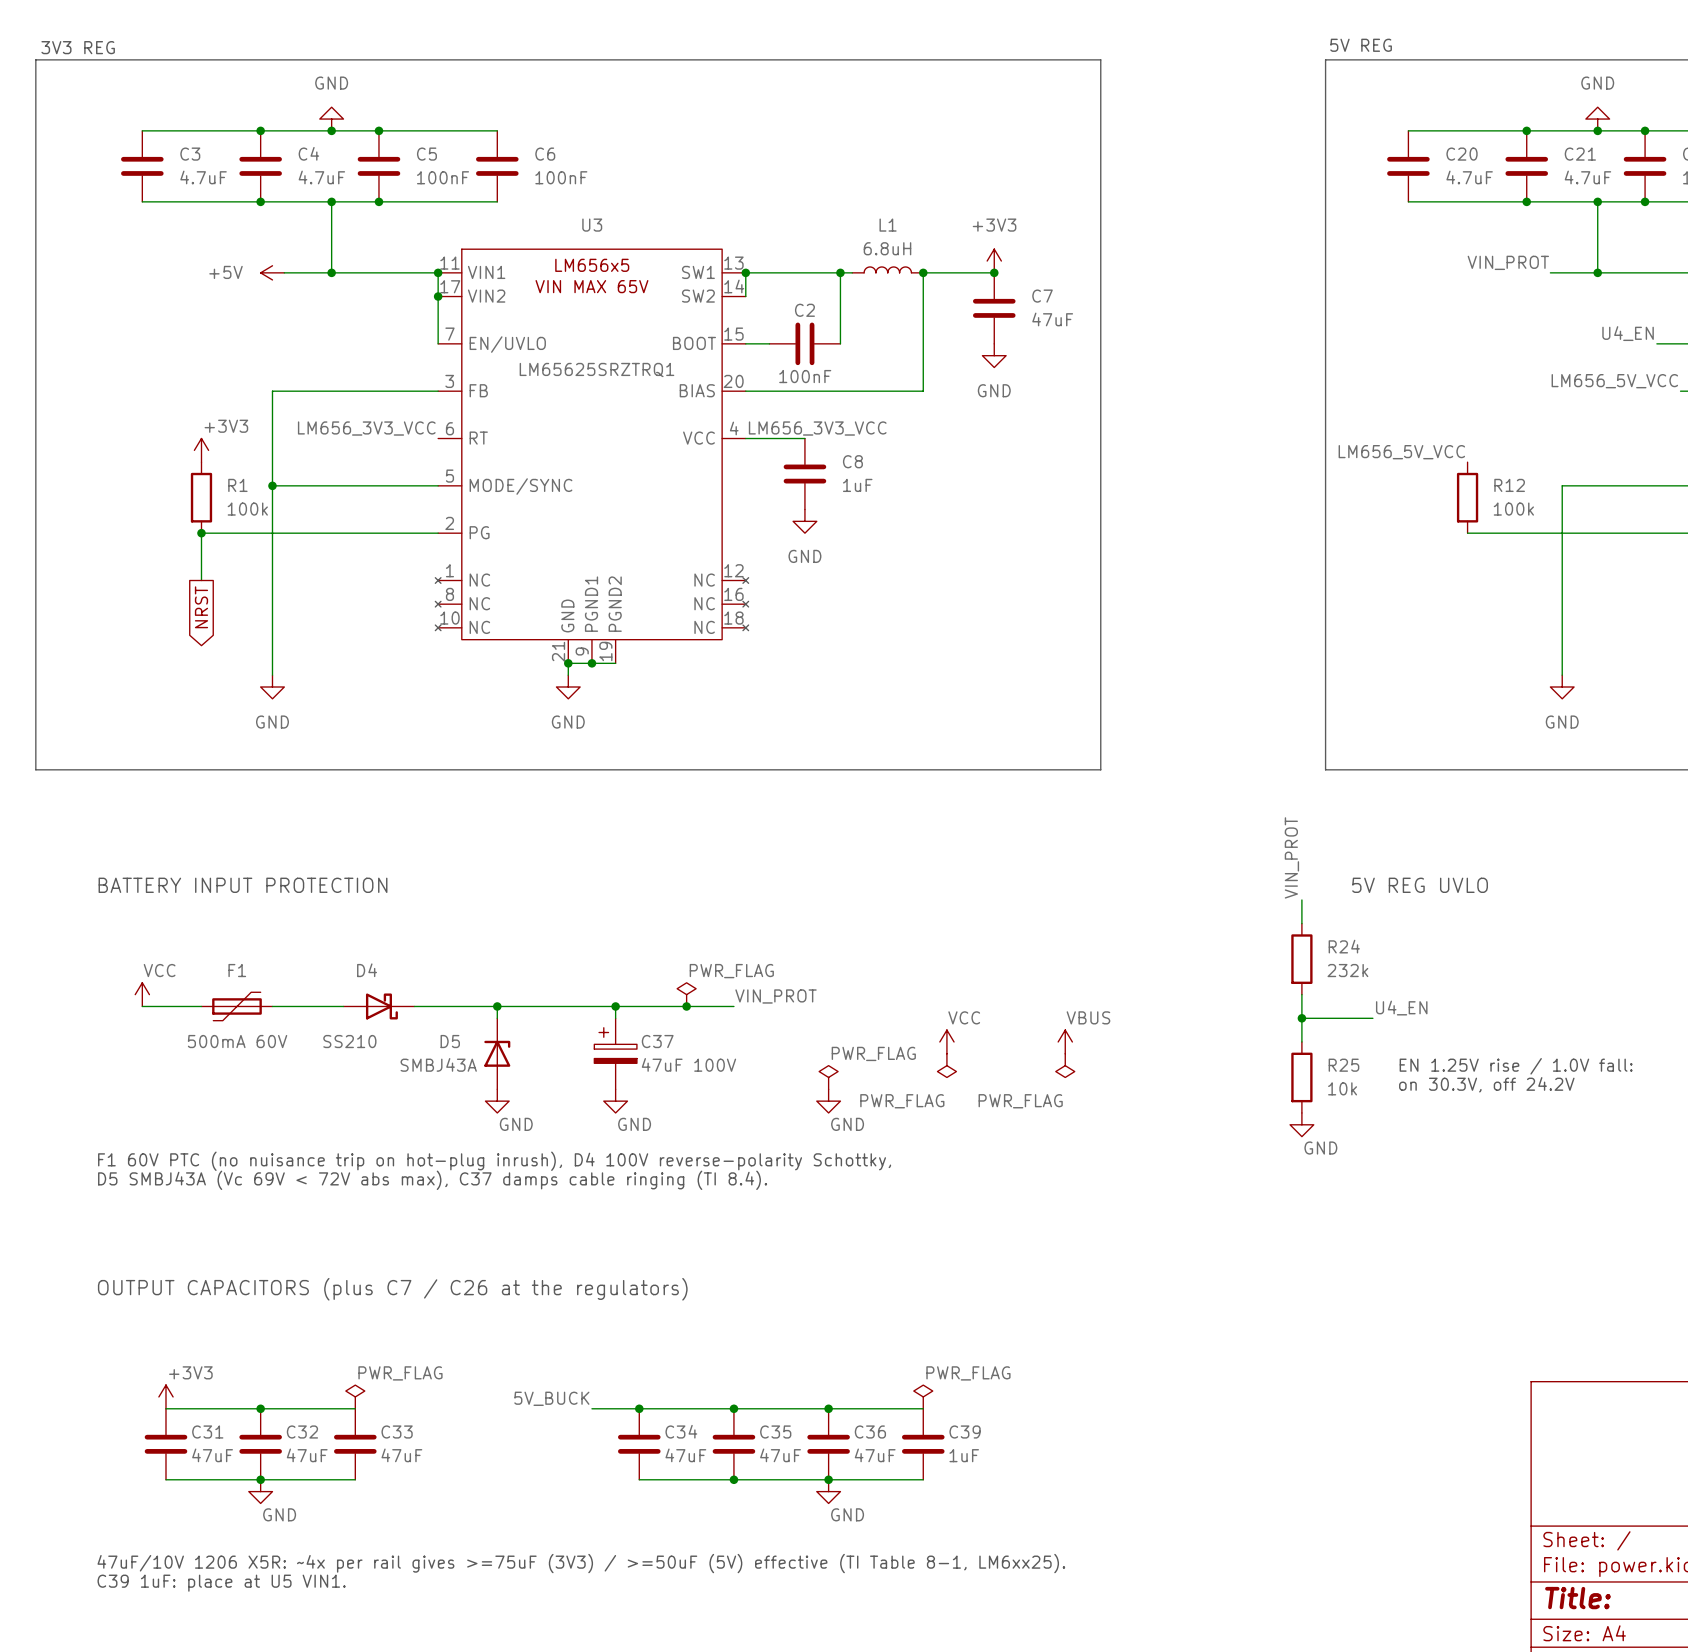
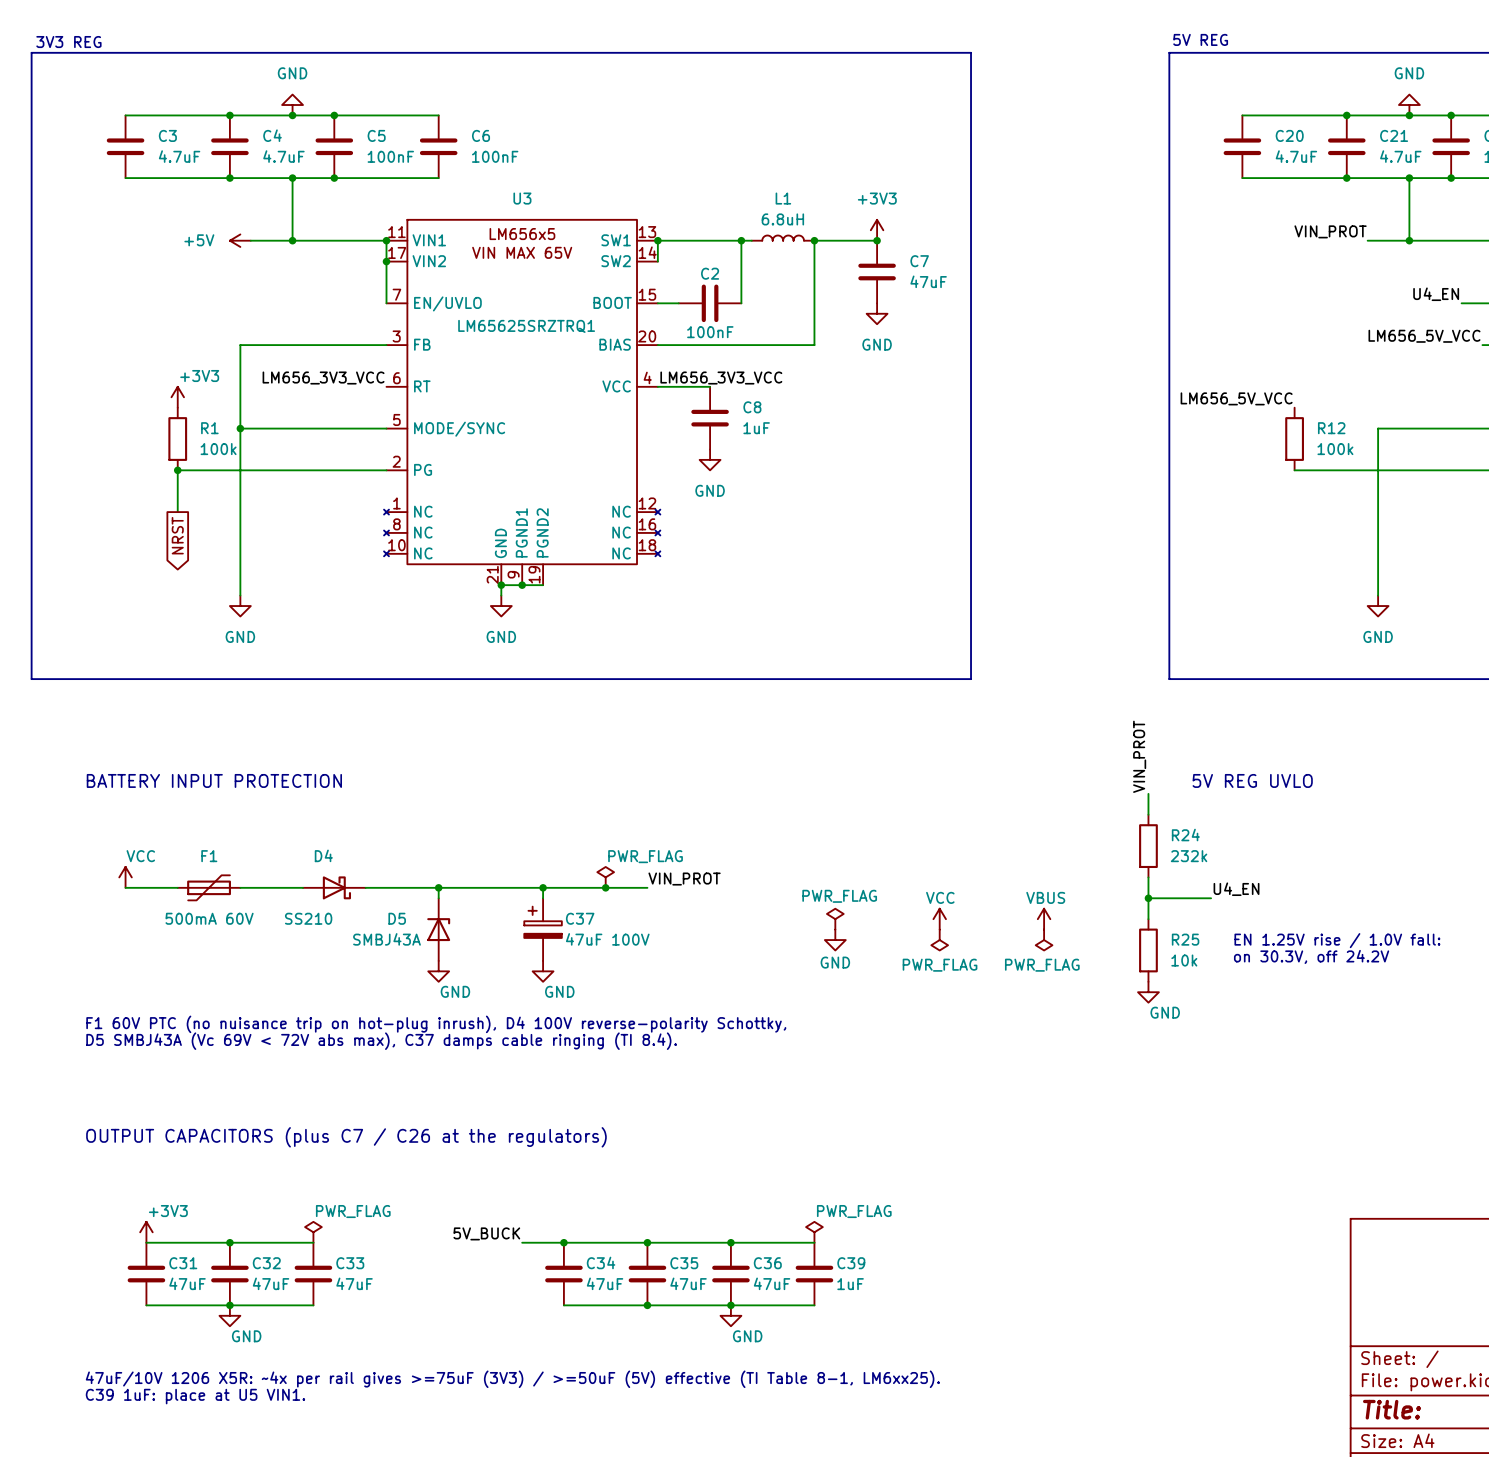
power symbol: VCC (946, 1041) -> PWR_FLAG (835, 919)
power symbol: VBUS (1065, 1041) -> VCC (939, 919)
power symbol: none -> VBUS (1044, 919)
power symbol: PWR_FLAG (946, 1065) -> GND (835, 940)
power symbol: none -> PWR_FLAG (1044, 940)
power symbol: PWR_FLAG (828, 1077) -> none
power symbol: GND (828, 1101) -> none
power symbol text position: PWR_FLAG (1020, 1101) -> PWR_FLAG (940, 965)

